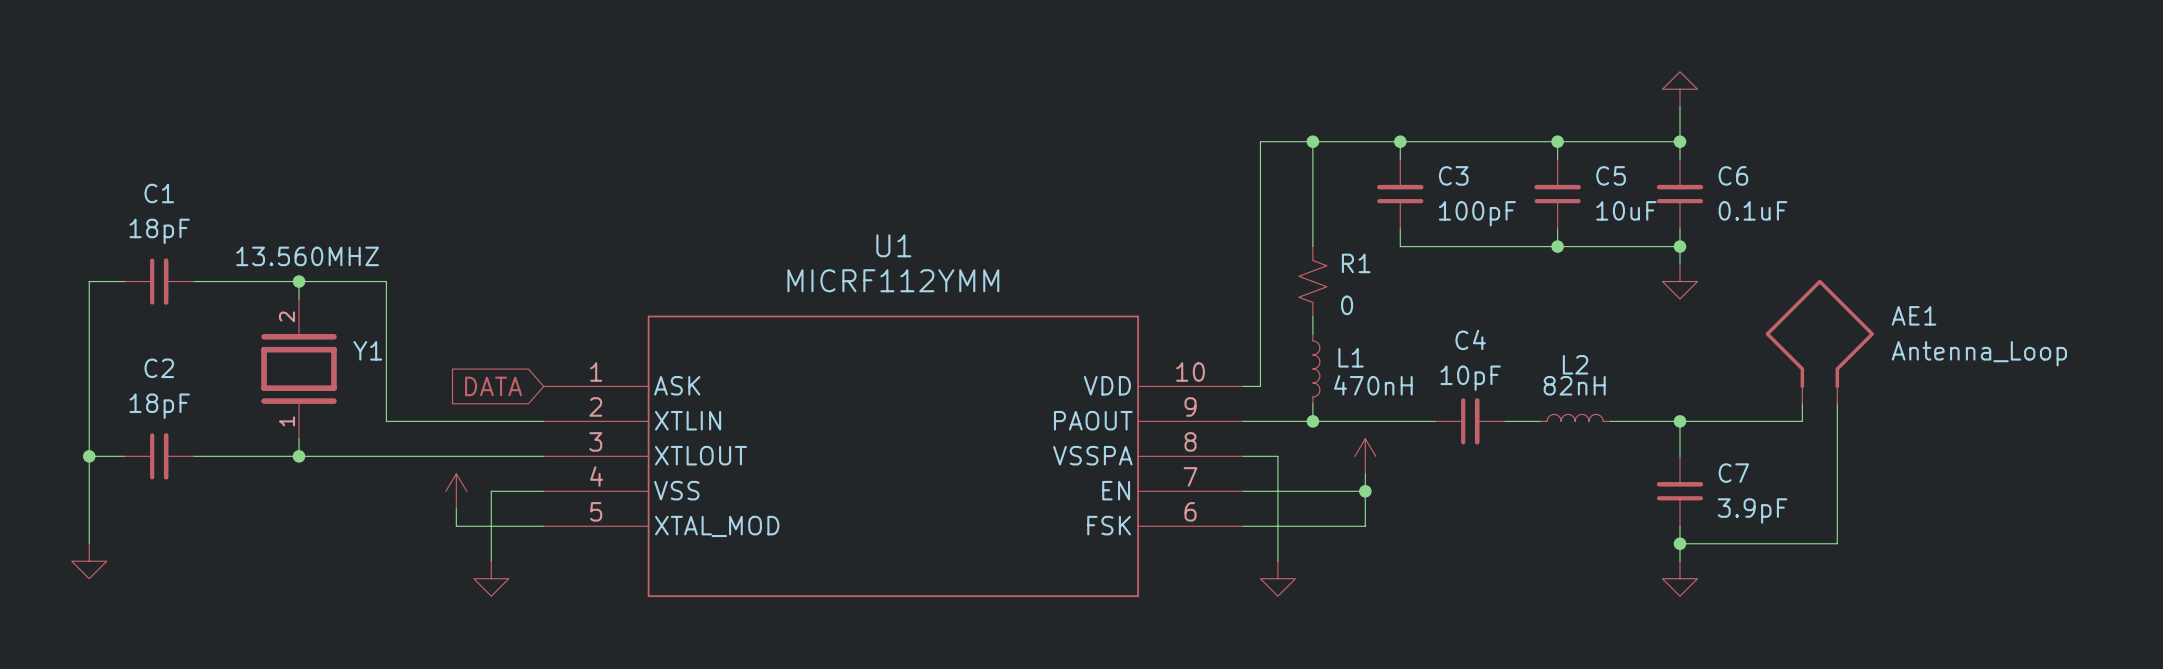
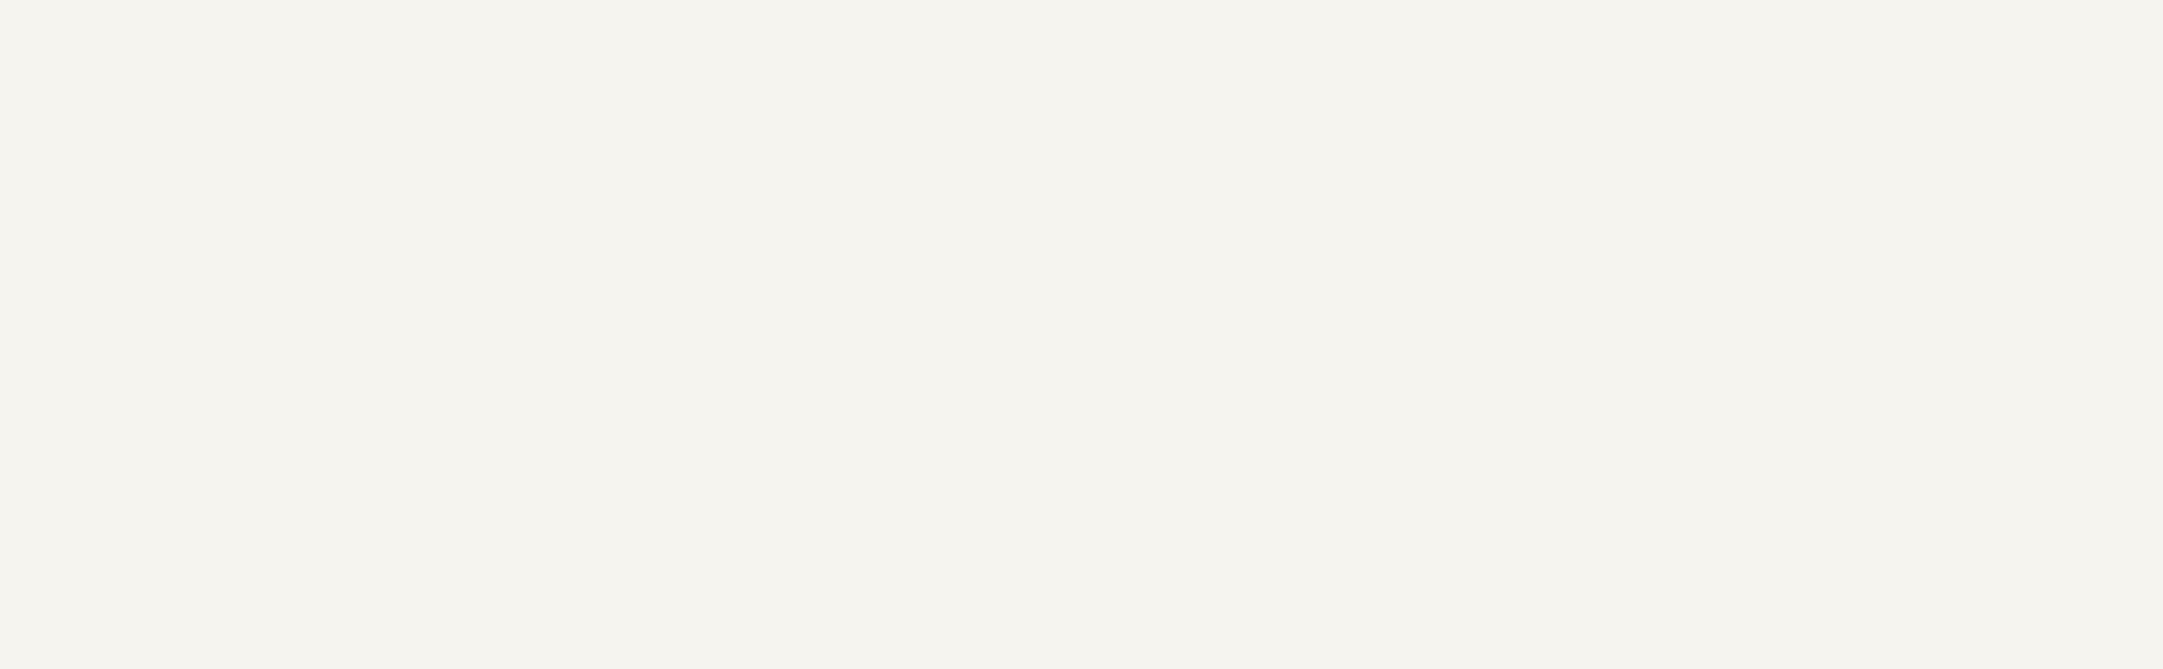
power symbol: (1679, 89) -> none
wire: (1679, 106) (1679, 159) -> none
wire: (1312, 141) (1312, 246) -> none
junction: (1312, 141) -> none
wire: (1400, 141) (1400, 159) -> none
junction: (1400, 141) -> none
wire: (1557, 141) (1557, 159) -> none
junction: (1557, 141) -> none
wire: (1679, 141) (1260, 141) (1260, 386) (1242, 386) -> none
junction: (1679, 141) -> none
C3: 100pF (1400, 194) -> none
C5: 10uF (1557, 194) -> none
C6: 0.1uF (1679, 194) -> none
wire: (1400, 229) (1400, 246) (1679, 246) -> none
wire: (1557, 229) (1557, 246) -> none
wire: (1679, 229) (1679, 264) -> none
junction: (1557, 246) -> none
junction: (1679, 246) -> none
wire: (124, 281) (89, 281) (89, 543) -> none
C1: 18pF (159, 281) -> none
wire: (194, 281) (386, 281) (386, 421) (543, 421) -> none
wire: (299, 281) (299, 299) -> none
junction: (299, 281) -> none
R1: 0 (1312, 281) -> none
power symbol: (1679, 281) -> none
wire: (1312, 316) (1312, 333) -> none
AE1: Antenna_Loop (1819, 341) -> none
Y1: 13.560MHZ (299, 368) -> none
L1: 470nH (1316, 368) -> none
global label: DATA (493, 386) -> none
wire: (1312, 403) (1312, 421) -> none
wire: (1802, 403) (1802, 421) (1610, 421) -> none
wire: (1837, 403) (1837, 543) (1679, 543) -> none
L2: 82nH (1575, 417) -> none
wire: (1242, 421) (1435, 421) -> none
junction: (1312, 421) -> none
C4: 10pF (1470, 421) -> none
wire: (1505, 421) (1540, 421) -> none
wire: (1679, 421) (1679, 456) -> none
junction: (1679, 421) -> none
wire: (299, 438) (299, 456) -> none
wire: (89, 456) (124, 456) -> none
junction: (89, 456) -> none
C2: 18pF (159, 456) -> none
wire: (194, 456) (543, 456) -> none
junction: (299, 456) -> none
U1: MICRF112YMM (893, 456) -> none
wire: (1242, 456) (1277, 456) (1277, 561) -> none
power symbol: (1365, 456) -> none
wire: (1365, 473) (1365, 526) (1242, 526) -> none
power symbol: (456, 491) -> none
wire: (543, 491) (491, 491) (491, 561) -> none
wire: (1242, 491) (1365, 491) -> none
junction: (1365, 491) -> none
C7: 3.9pF (1679, 491) -> none
wire: (456, 508) (456, 526) (543, 526) -> none
wire: (1679, 526) (1679, 561) -> none
junction: (1679, 543) -> none
power symbol: (89, 561) -> none
power symbol: (491, 578) -> none
power symbol: (1277, 578) -> none
power symbol: (1679, 578) -> none

